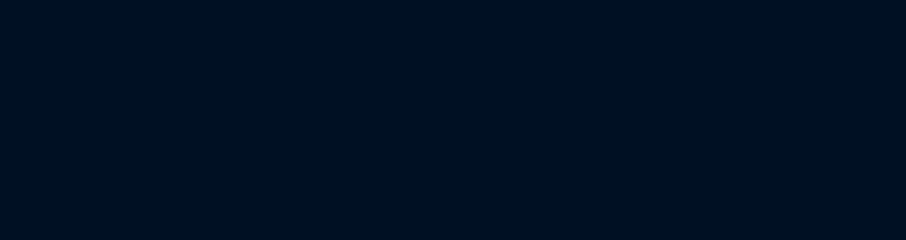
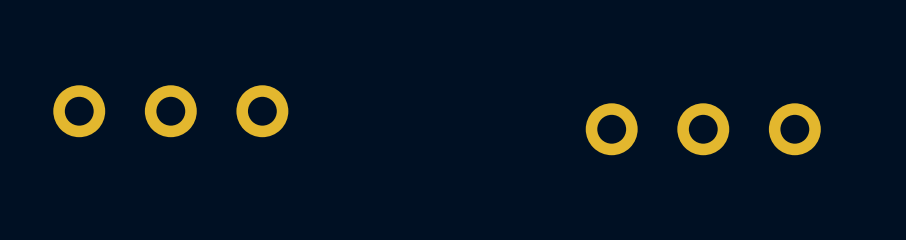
part: none -> (170, 111)
part: none -> (703, 129)

